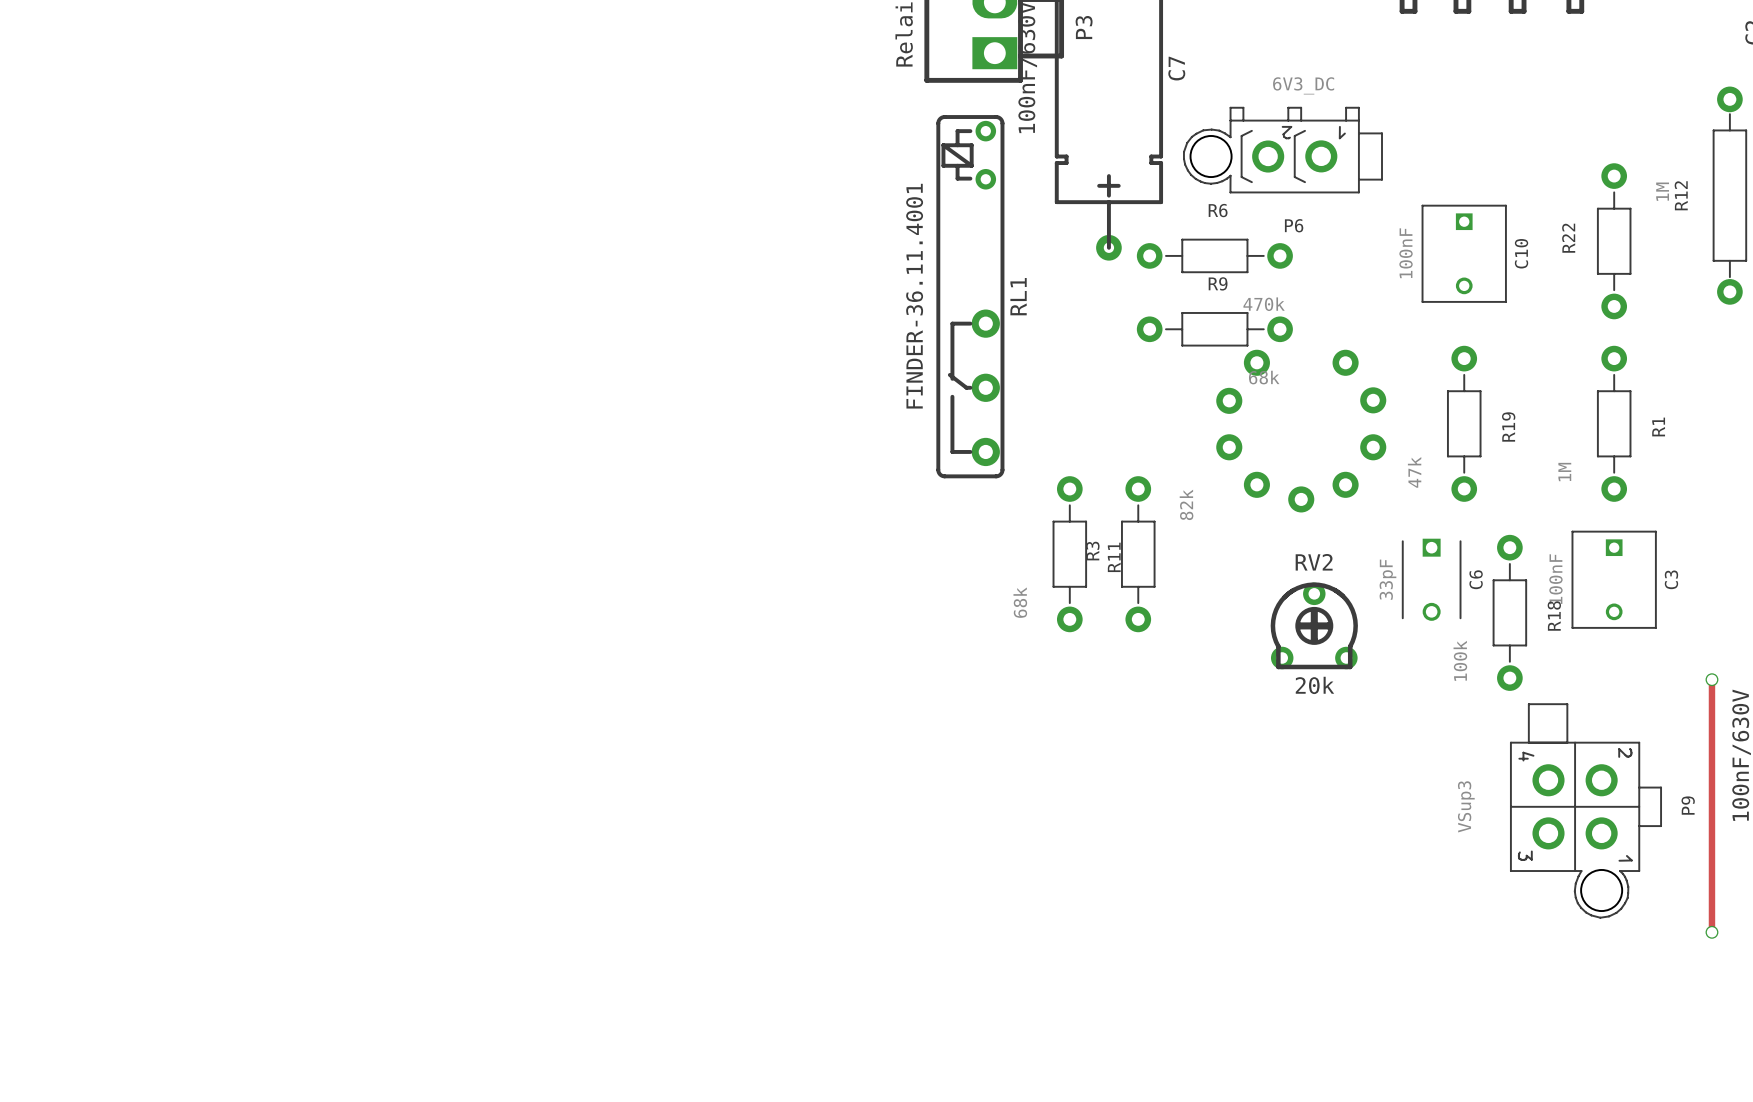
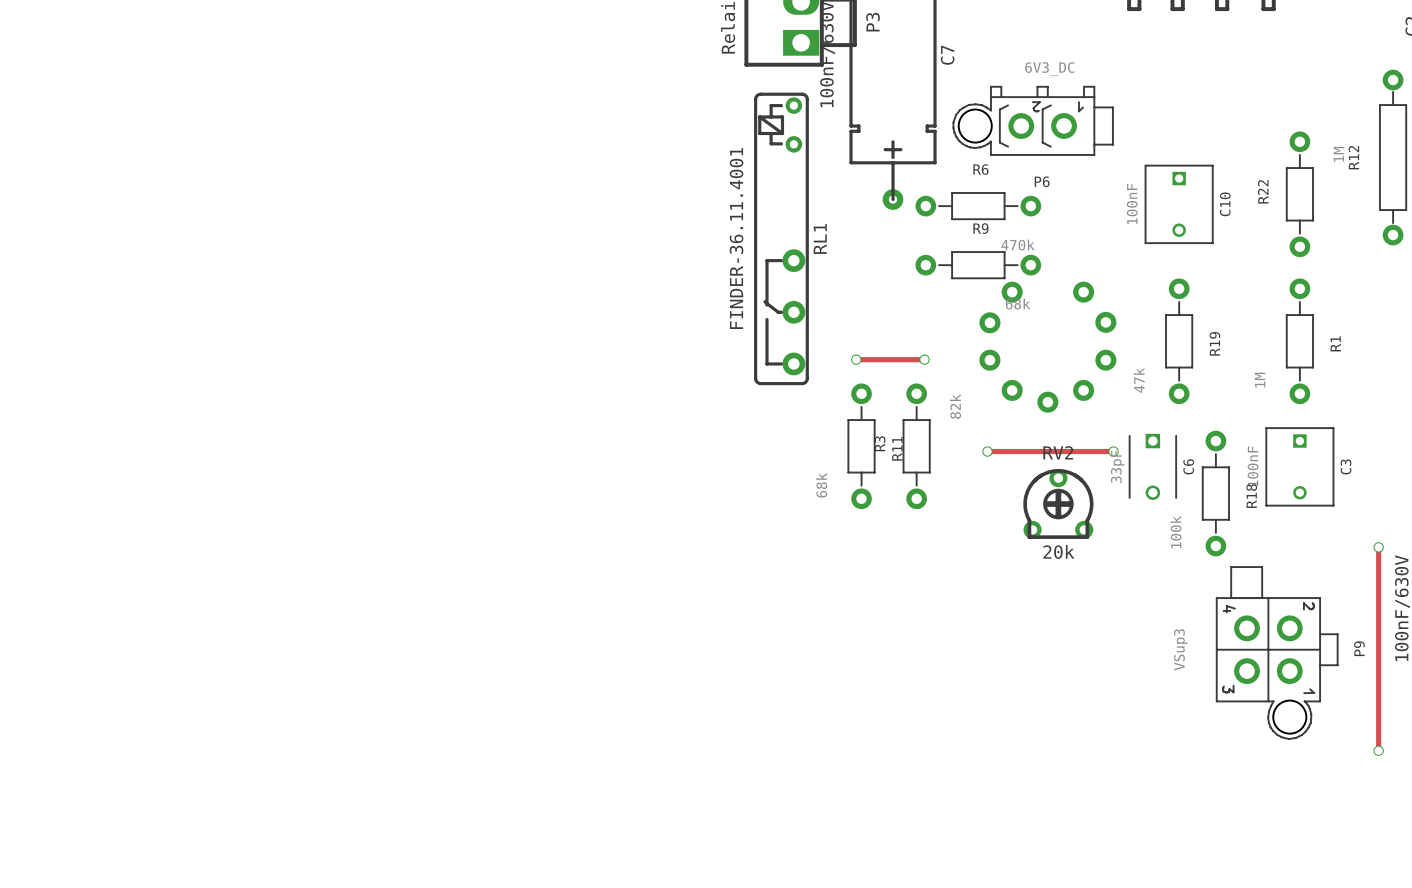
track: none -> (856, 359) (924, 359)
via: none -> (856, 359)
via: none -> (924, 359)
track: none -> (987, 451) (1113, 451)
via: none -> (987, 451)
via: none -> (1113, 451)

